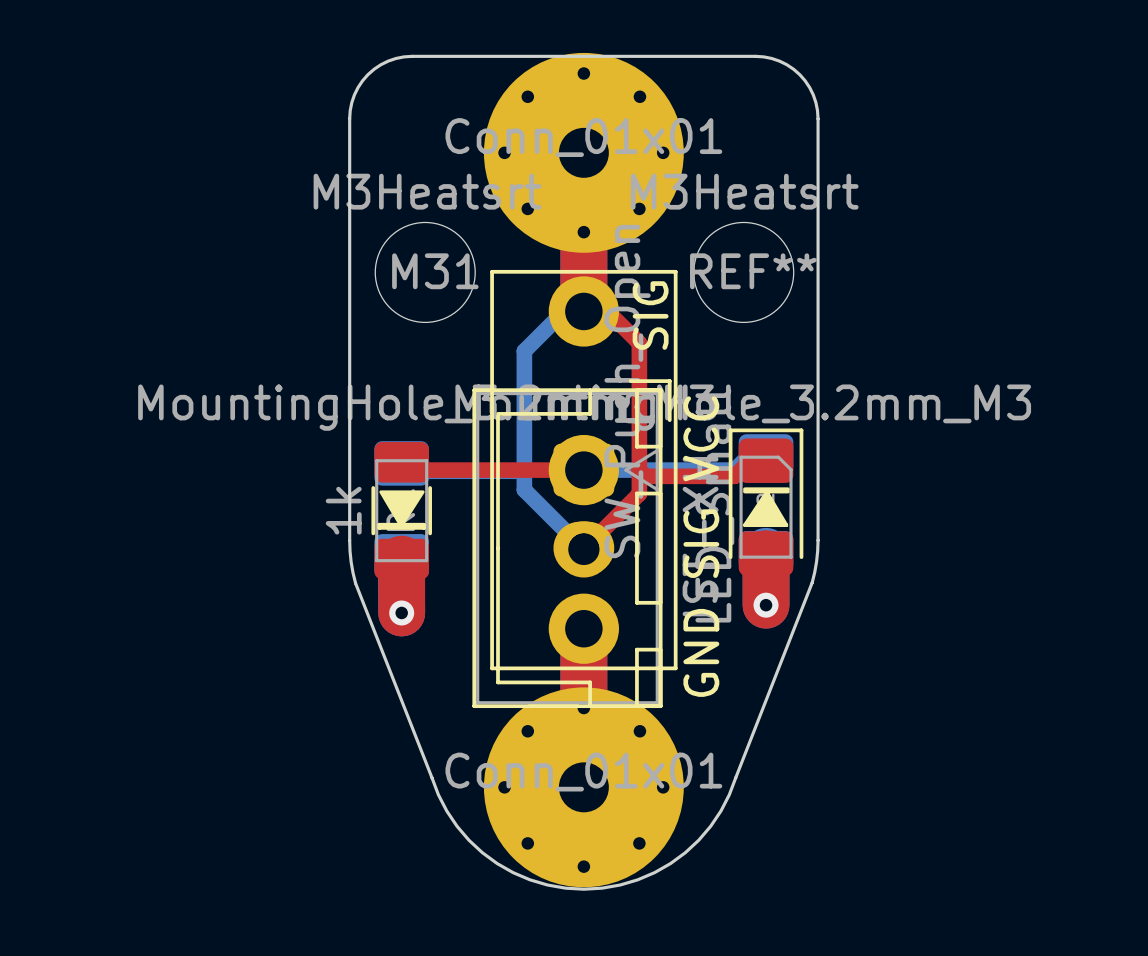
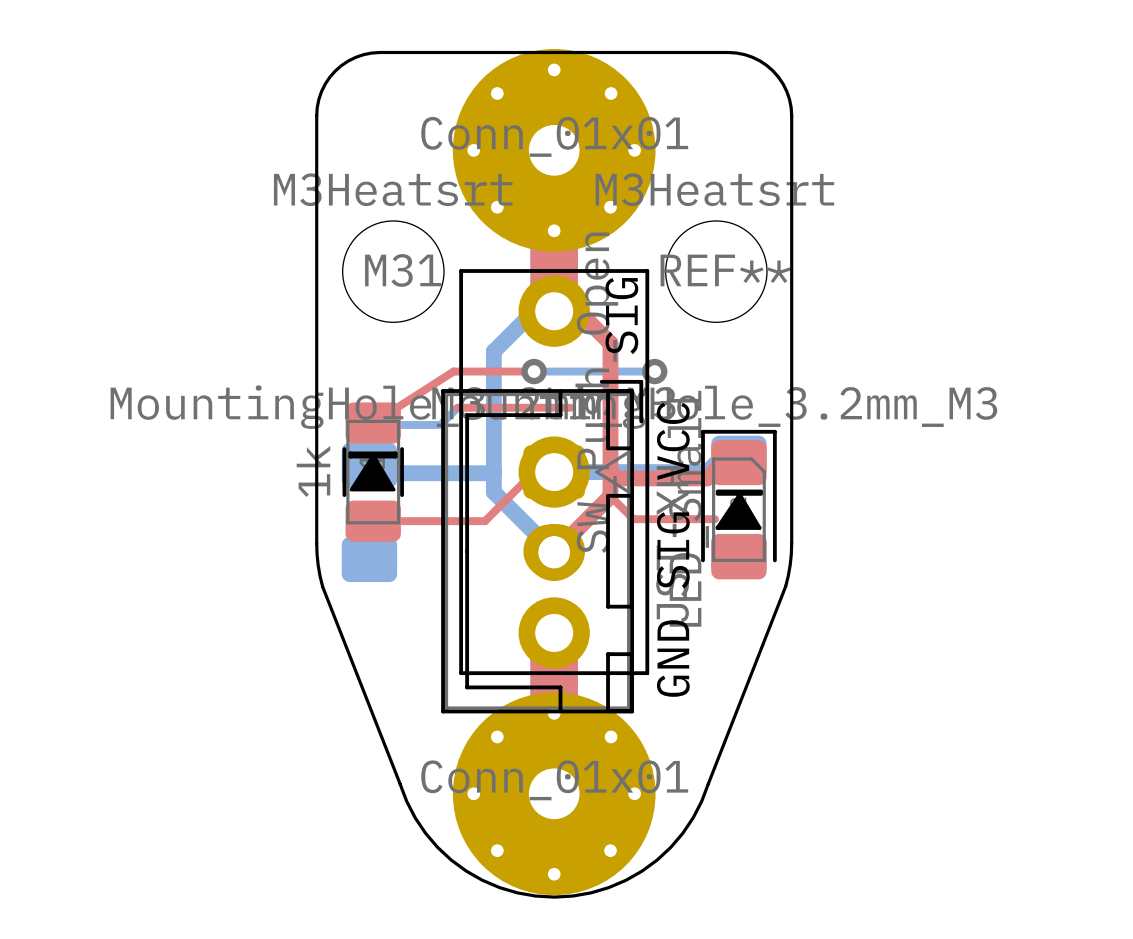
bottom track: none -> (534, 371) (654, 371)
top track: none -> (534, 371) (453, 371) (373, 423)
via: none -> (534, 371)
via: none -> (654, 371)
bottom track: none -> (457, 407) (440, 424) (373, 424)
top track: none -> (457, 407) (570, 407)
drawing: none -> [349, 453, 396, 492]
top track: (417, 470) (564, 470) -> (373, 521) (485, 521) (534, 472)
drawing: [379, 490, 425, 528] -> none
top track: none -> (610, 496) (633, 519) (715, 519)
part position: (401, 510) -> (373, 472)
line: (379, 524) (423, 524) (423, 527) (379, 527) (379, 524) -> (350, 453) (395, 453) (395, 456) (350, 456) (350, 453)
top track: (766, 553) (766, 605) -> none
top track: (401, 559) (401, 612) -> none
via: (766, 605) -> none
via: (401, 612) -> none

